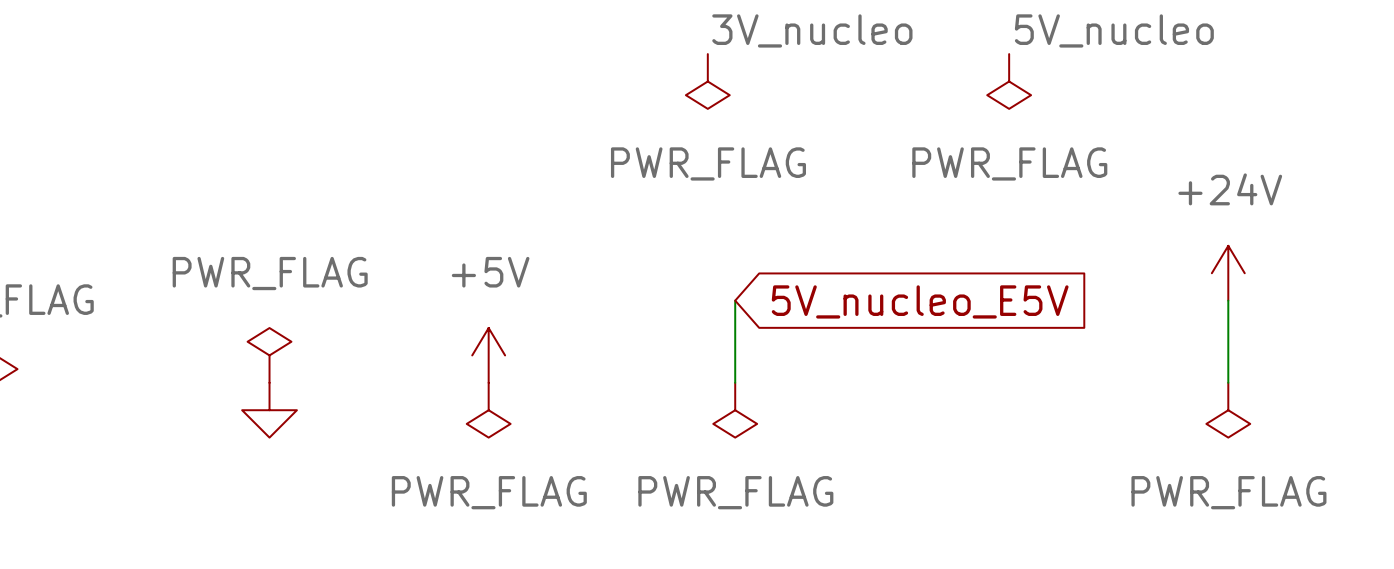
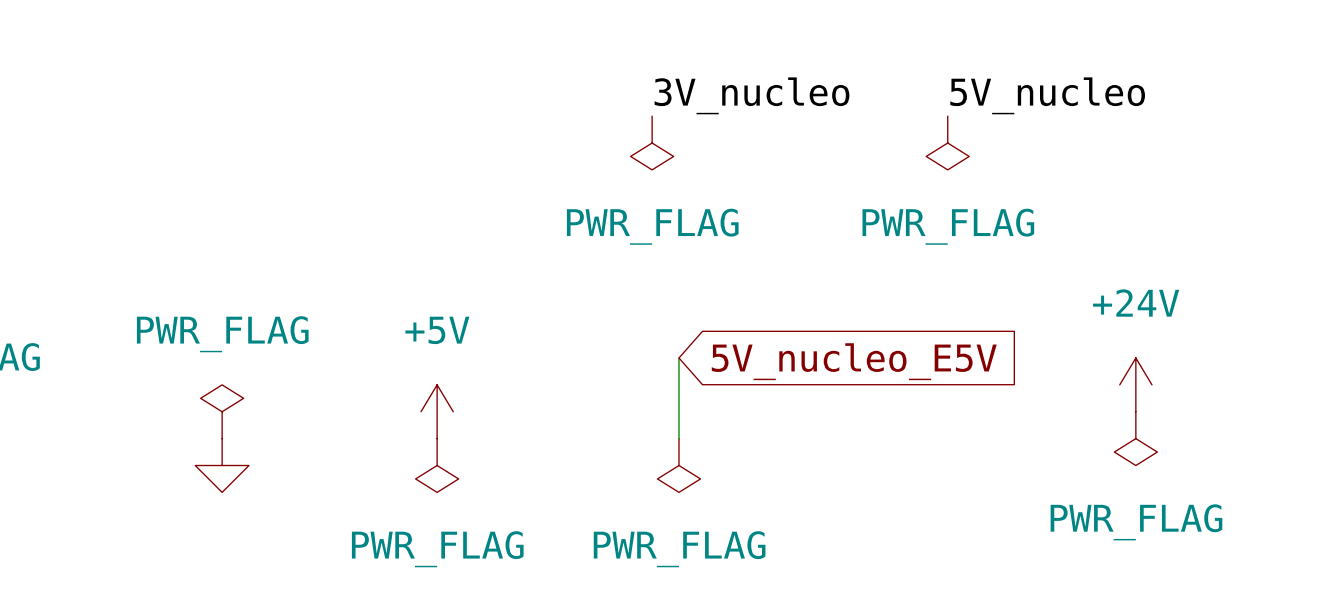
power symbol position: +24V (1228, 273) -> +24V (1135, 384)
wire: (1228, 300) (1228, 382) -> none
power symbol position: PWR_FLAG (1228, 410) -> PWR_FLAG (1135, 438)

